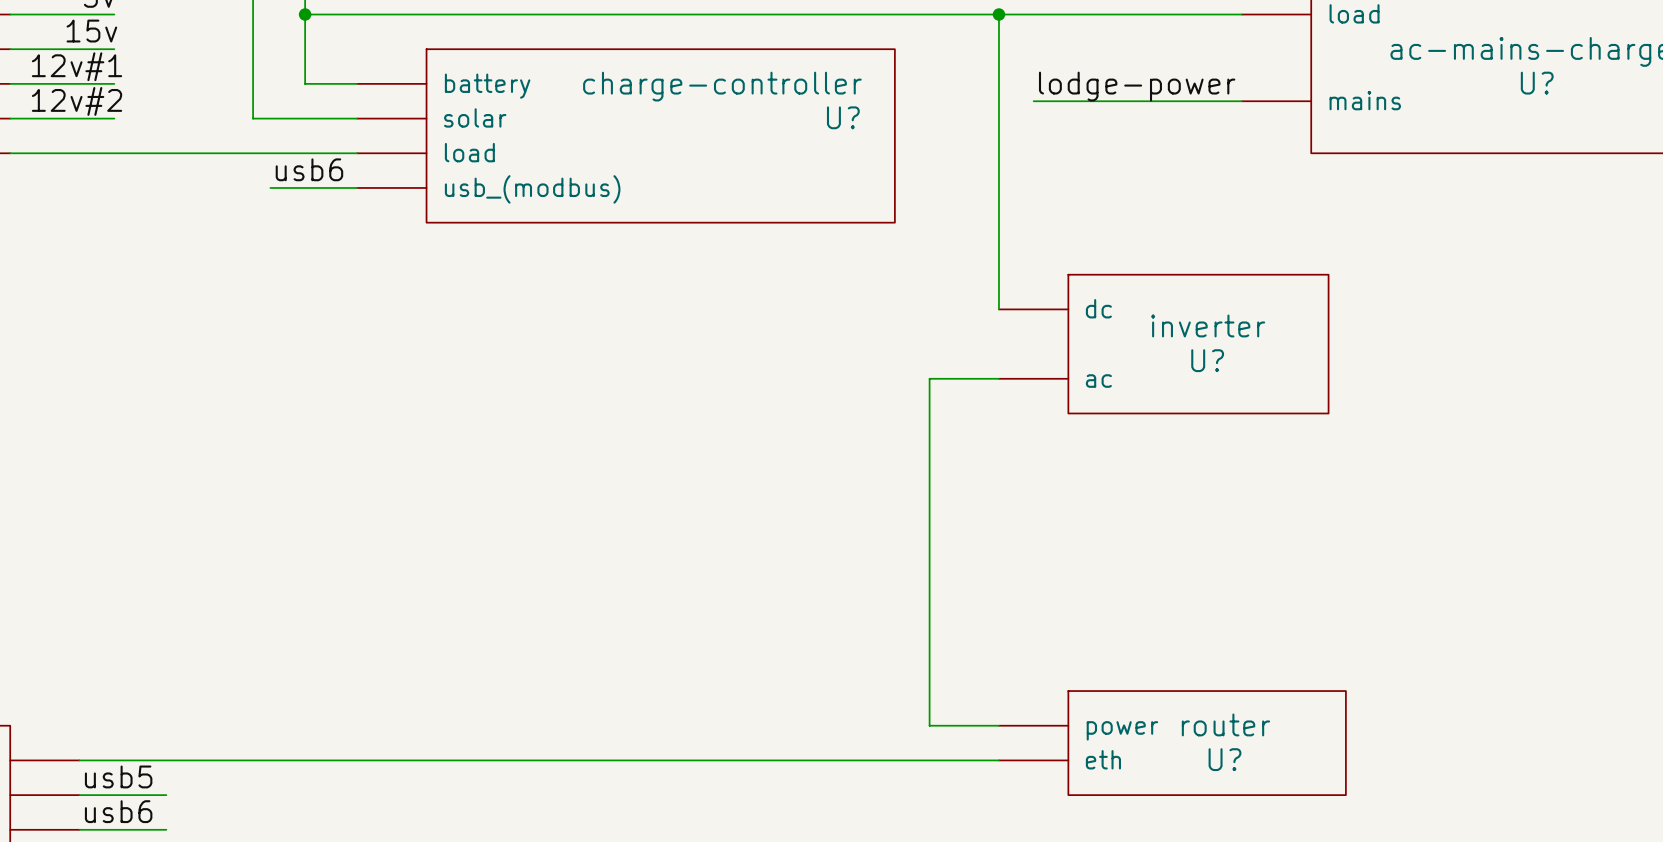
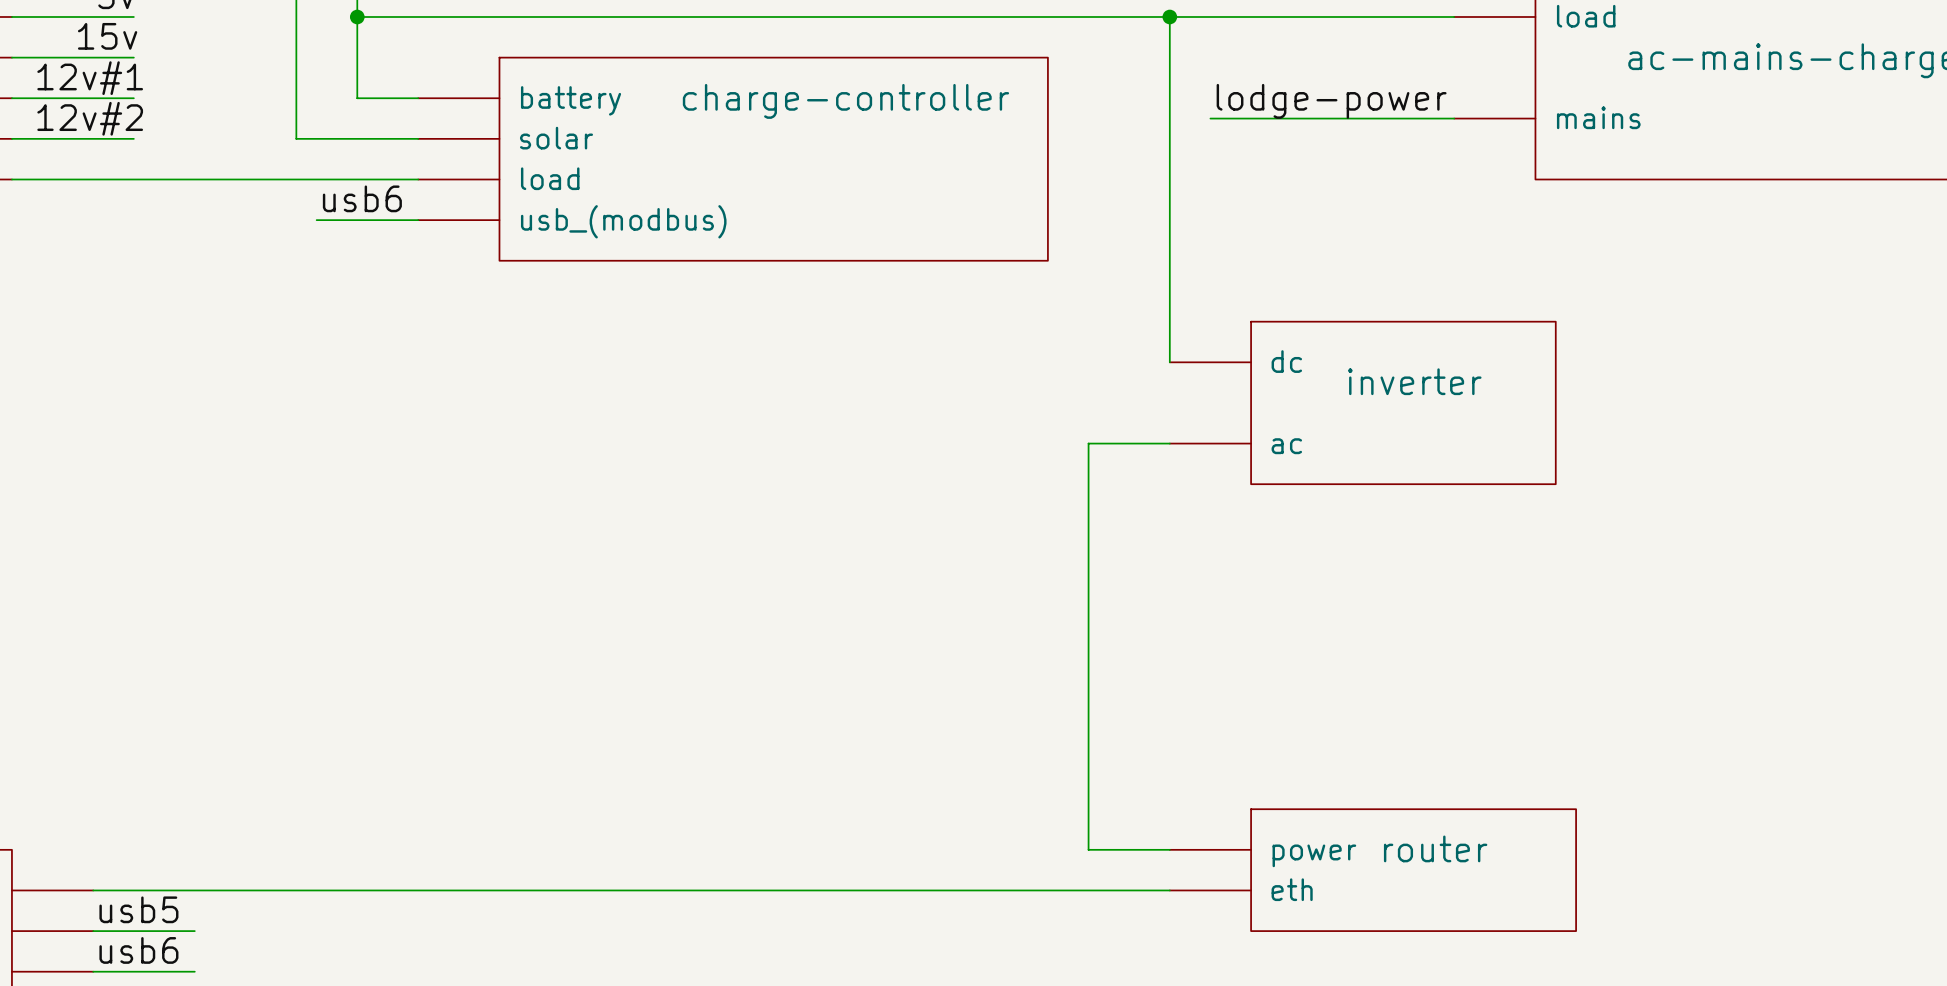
U? name: U? (1537, 83) -> none
U? name: U? (843, 117) -> none
U? name: U? (1207, 360) -> none
U? name: U? (1224, 759) -> none

